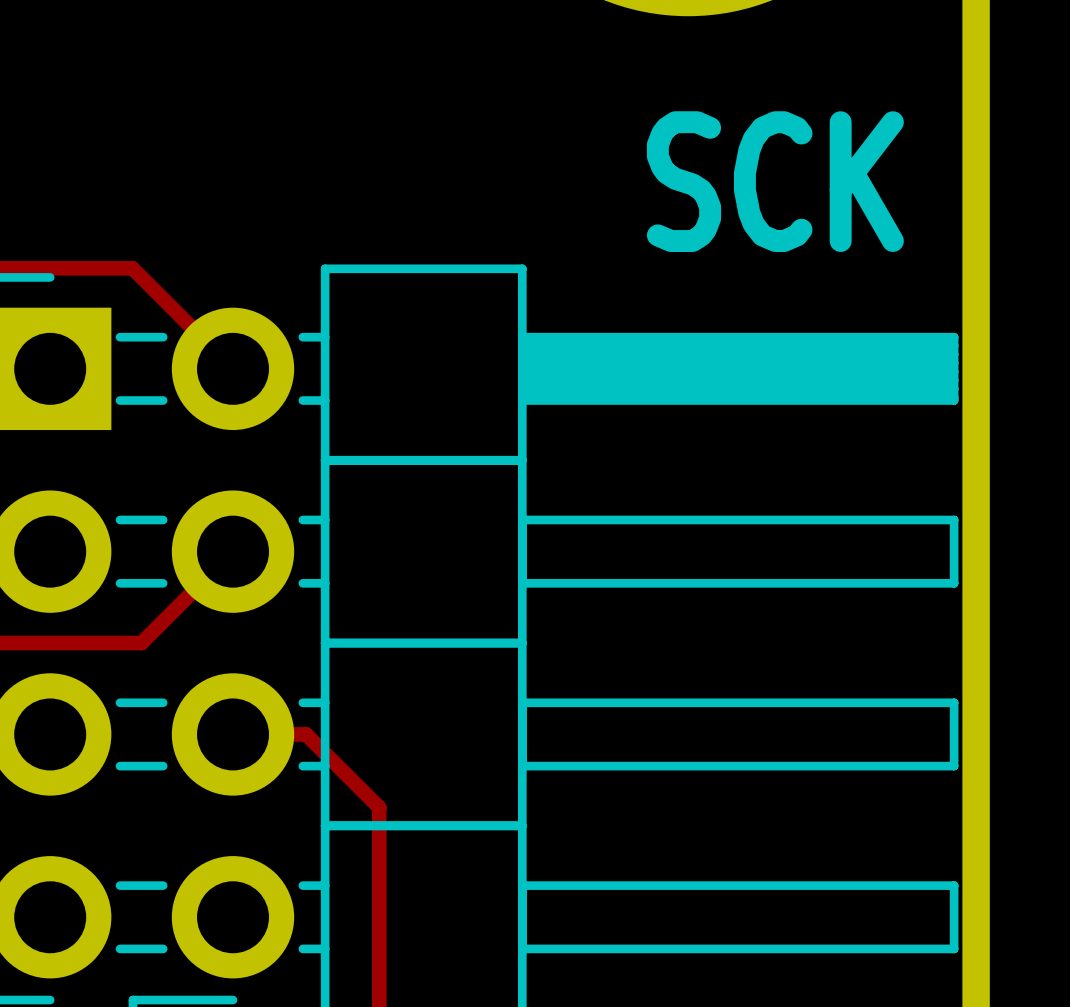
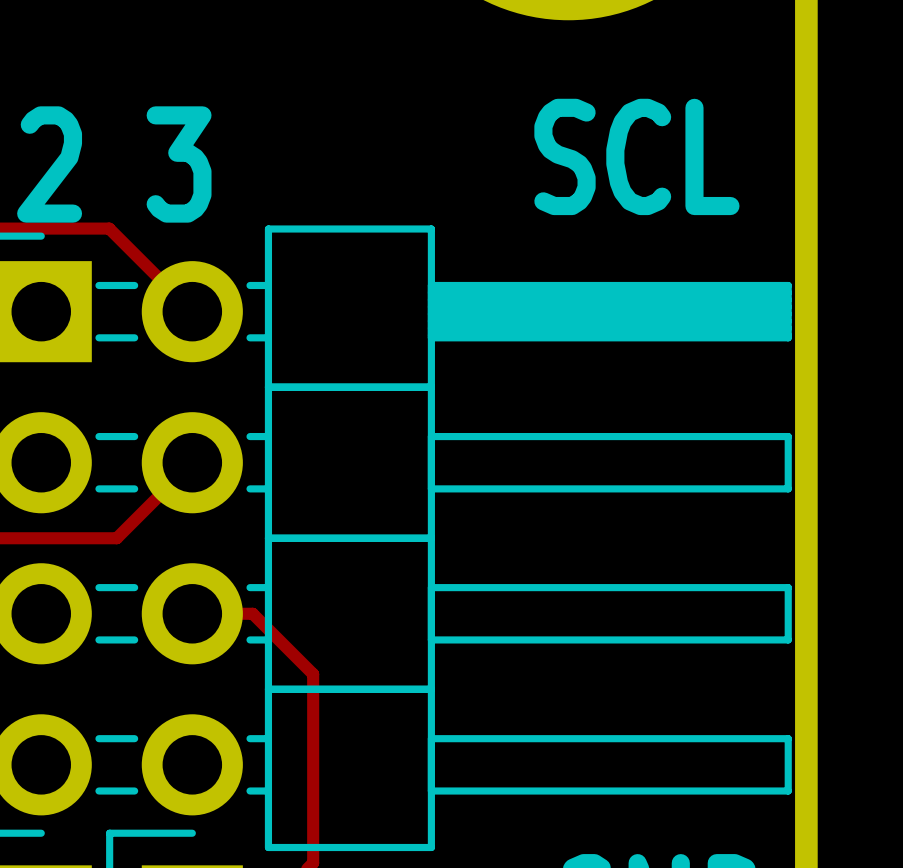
text: SCK (775, 181) -> SCL (636, 156)
text: none -> 2 3 (114, 164)

